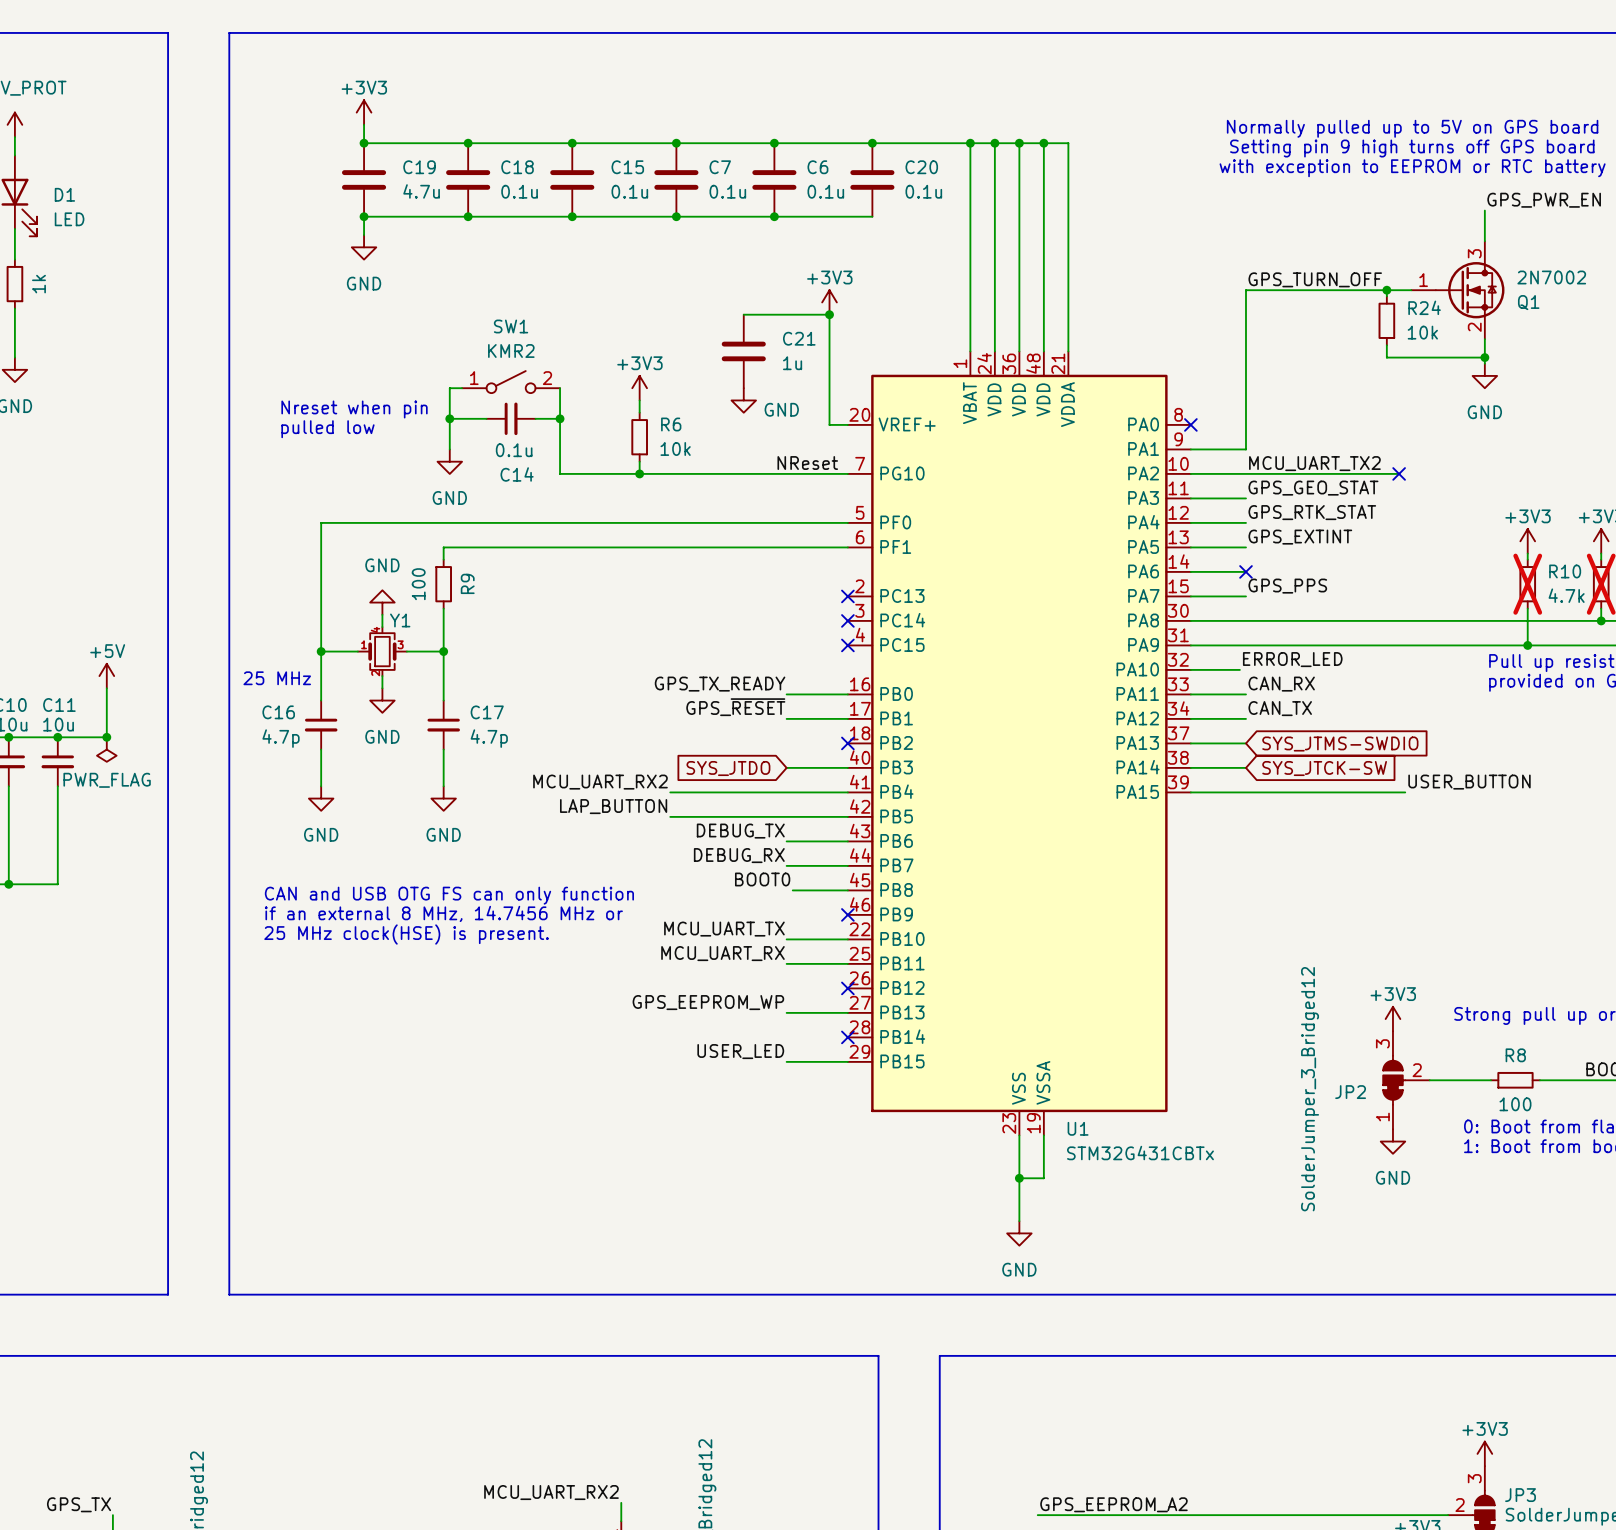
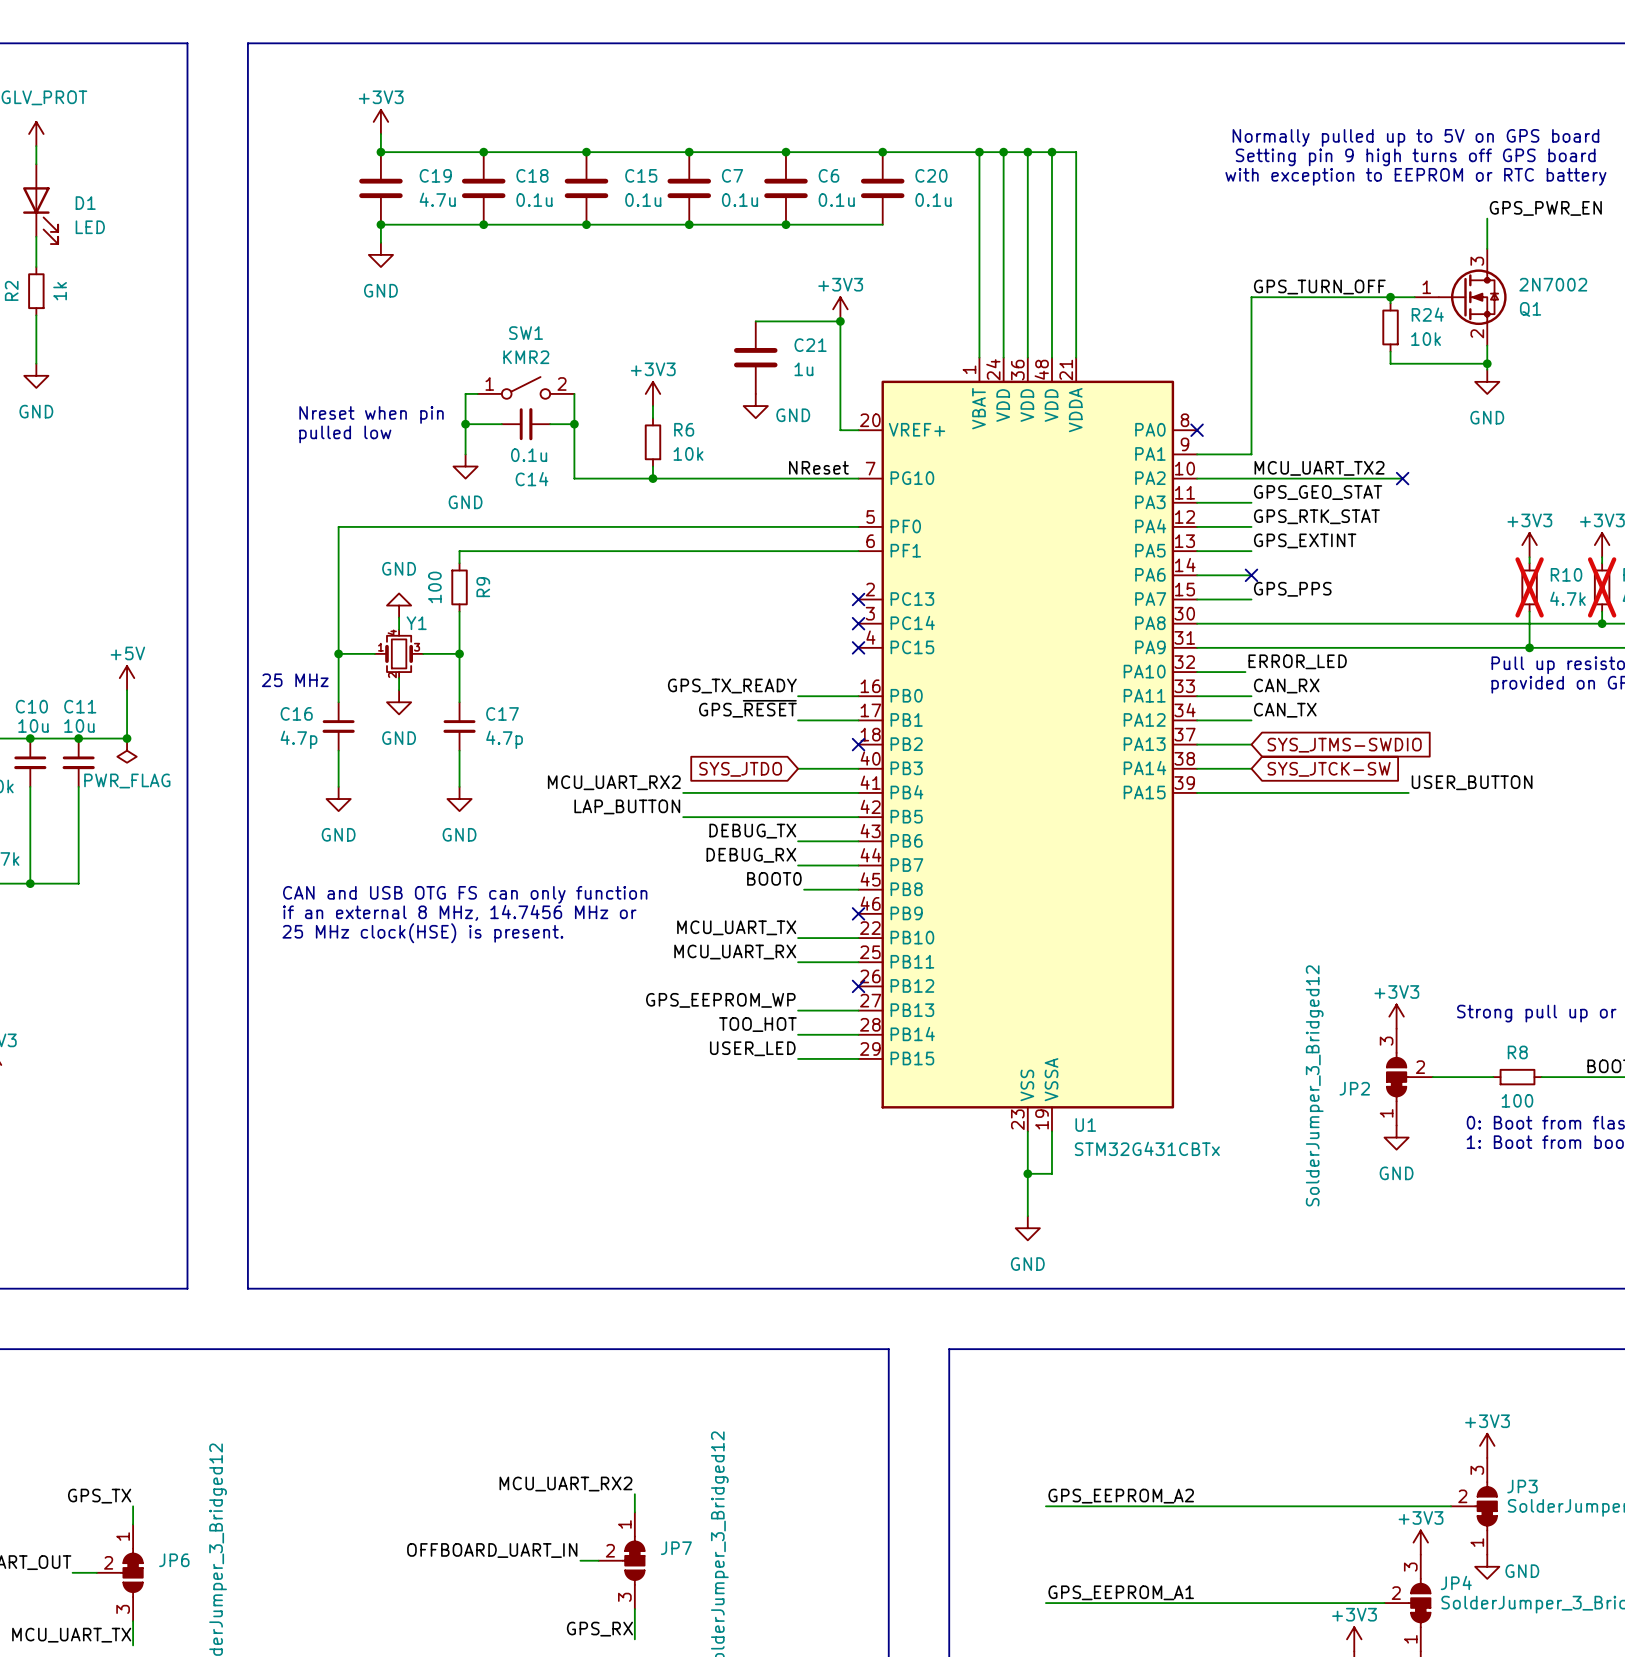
label: none -> TOO_HOT (757, 1024)
wire: none -> (798, 1034) (858, 1034)
no-connect mark: (847, 1037) -> none

